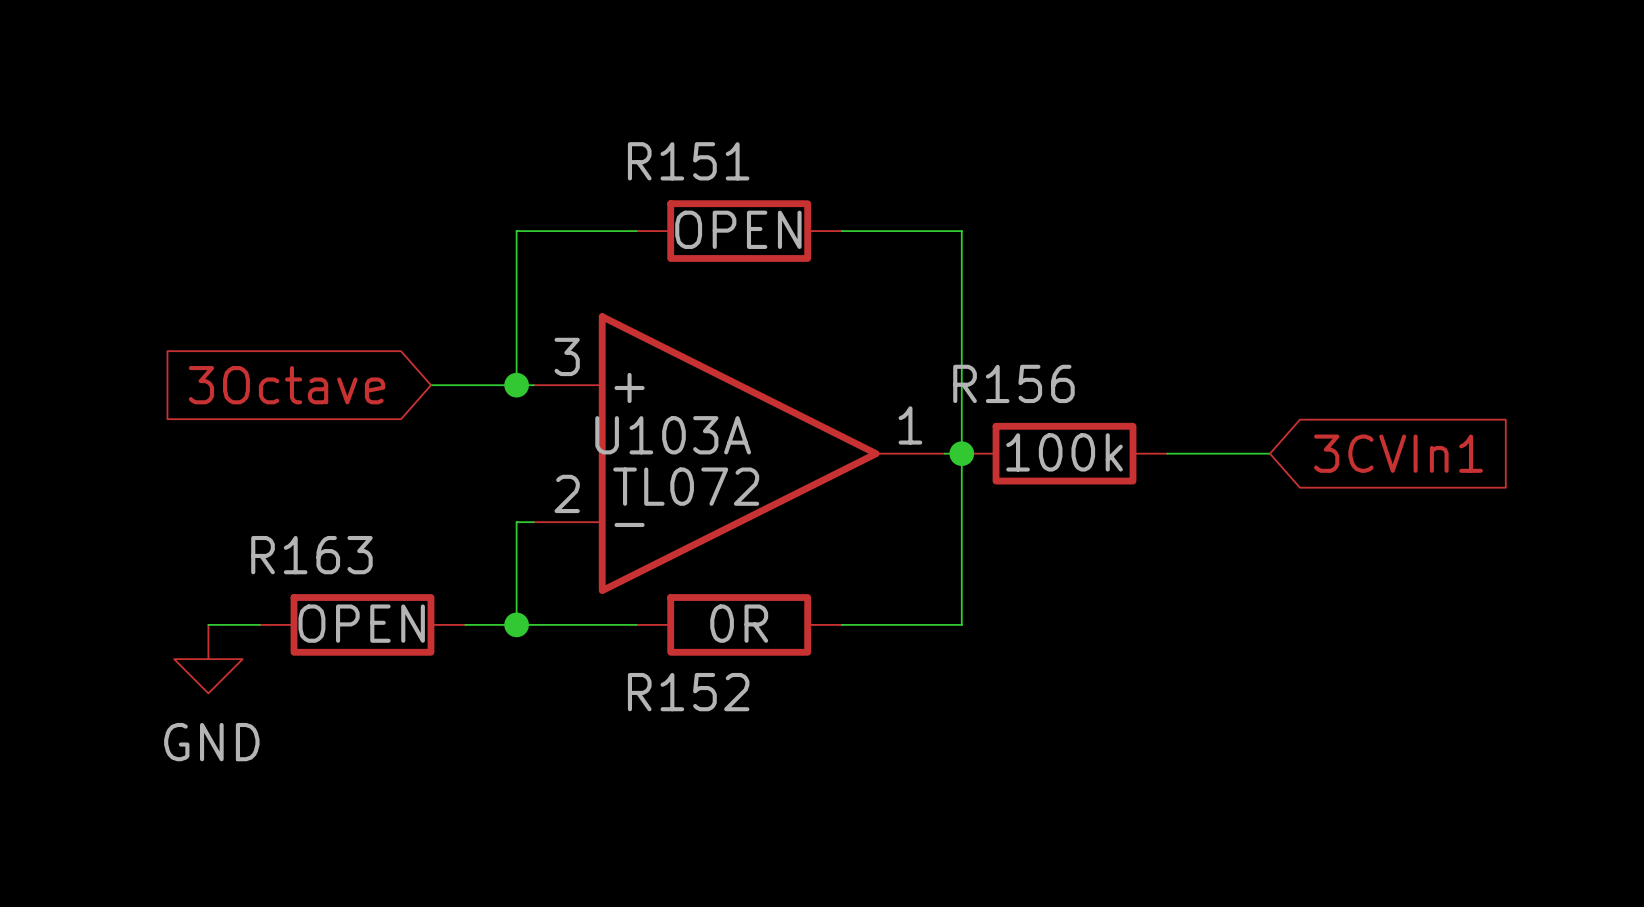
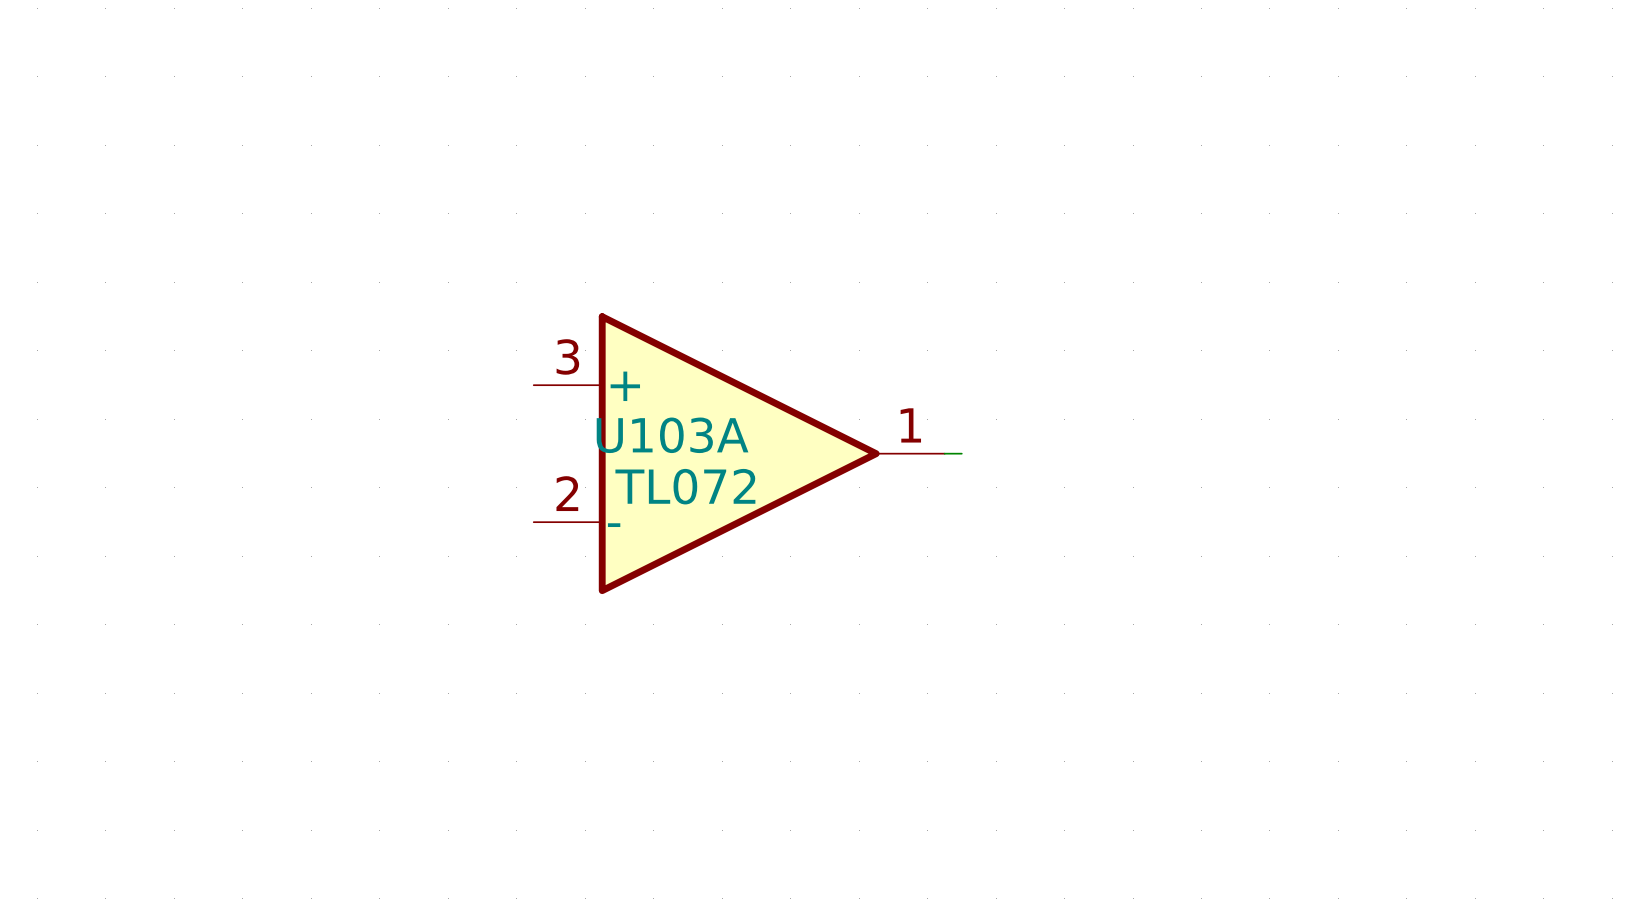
wire: (636, 231) (516, 231) (516, 385) -> none
R151: OPEN (739, 231) -> none
wire: (841, 231) (961, 231) (961, 624) (841, 624) -> none
global label: 3Octave (287, 385) -> none
wire: (431, 385) (533, 385) -> none
junction: (516, 385) -> none
junction: (961, 453) -> none
R156: 100k (1064, 453) -> none
wire: (1167, 453) (1269, 453) -> none
global label: 3CVIn1 (1398, 453) -> none
wire: (533, 522) (516, 522) (516, 624) -> none
wire: (208, 624) (259, 624) -> none
R163: OPEN (362, 624) -> none
wire: (465, 624) (636, 624) -> none
junction: (516, 624) -> none
R152: 0R (739, 624) -> none
power symbol: GND (208, 659) -> none

